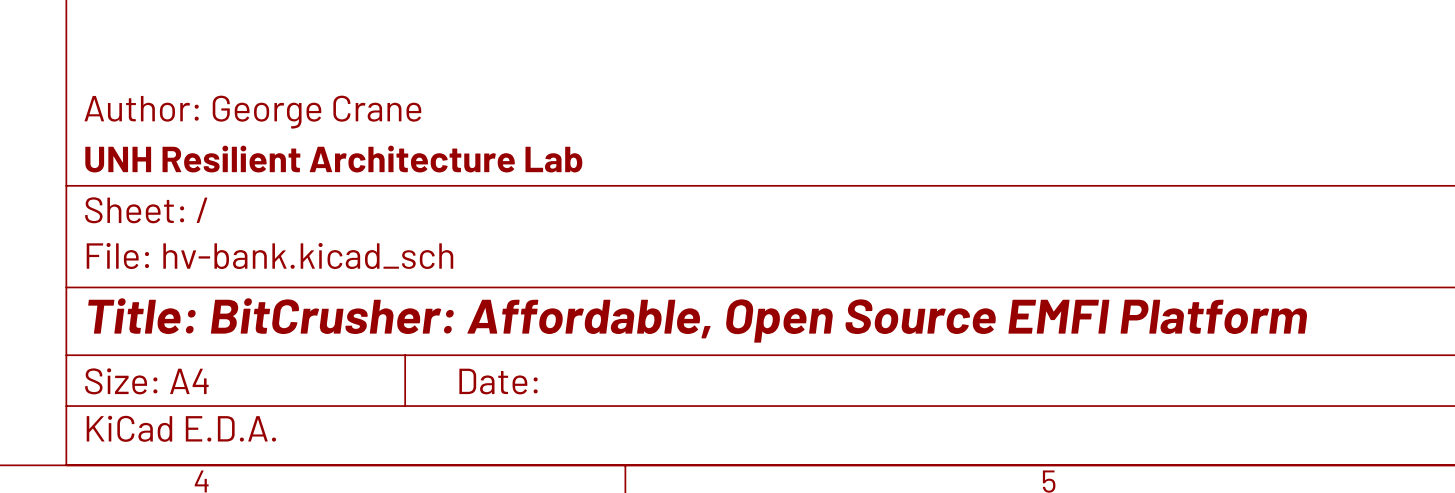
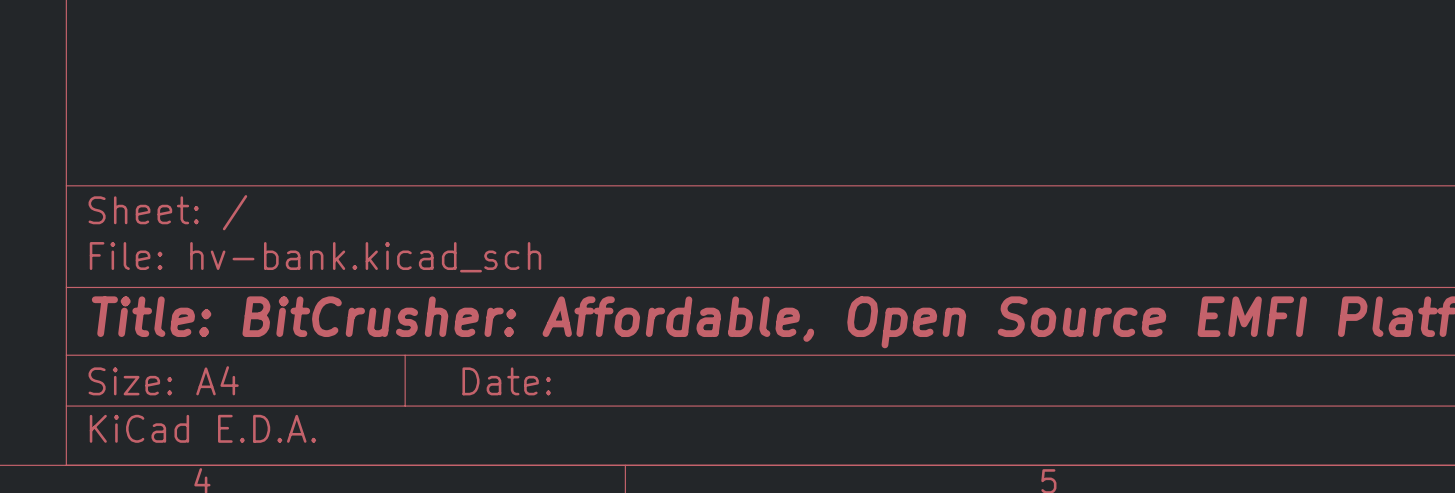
title block: Author: George Crane (252, 112) -> none
title block: UNH Resilient Architecture Lab (333, 159) -> none

